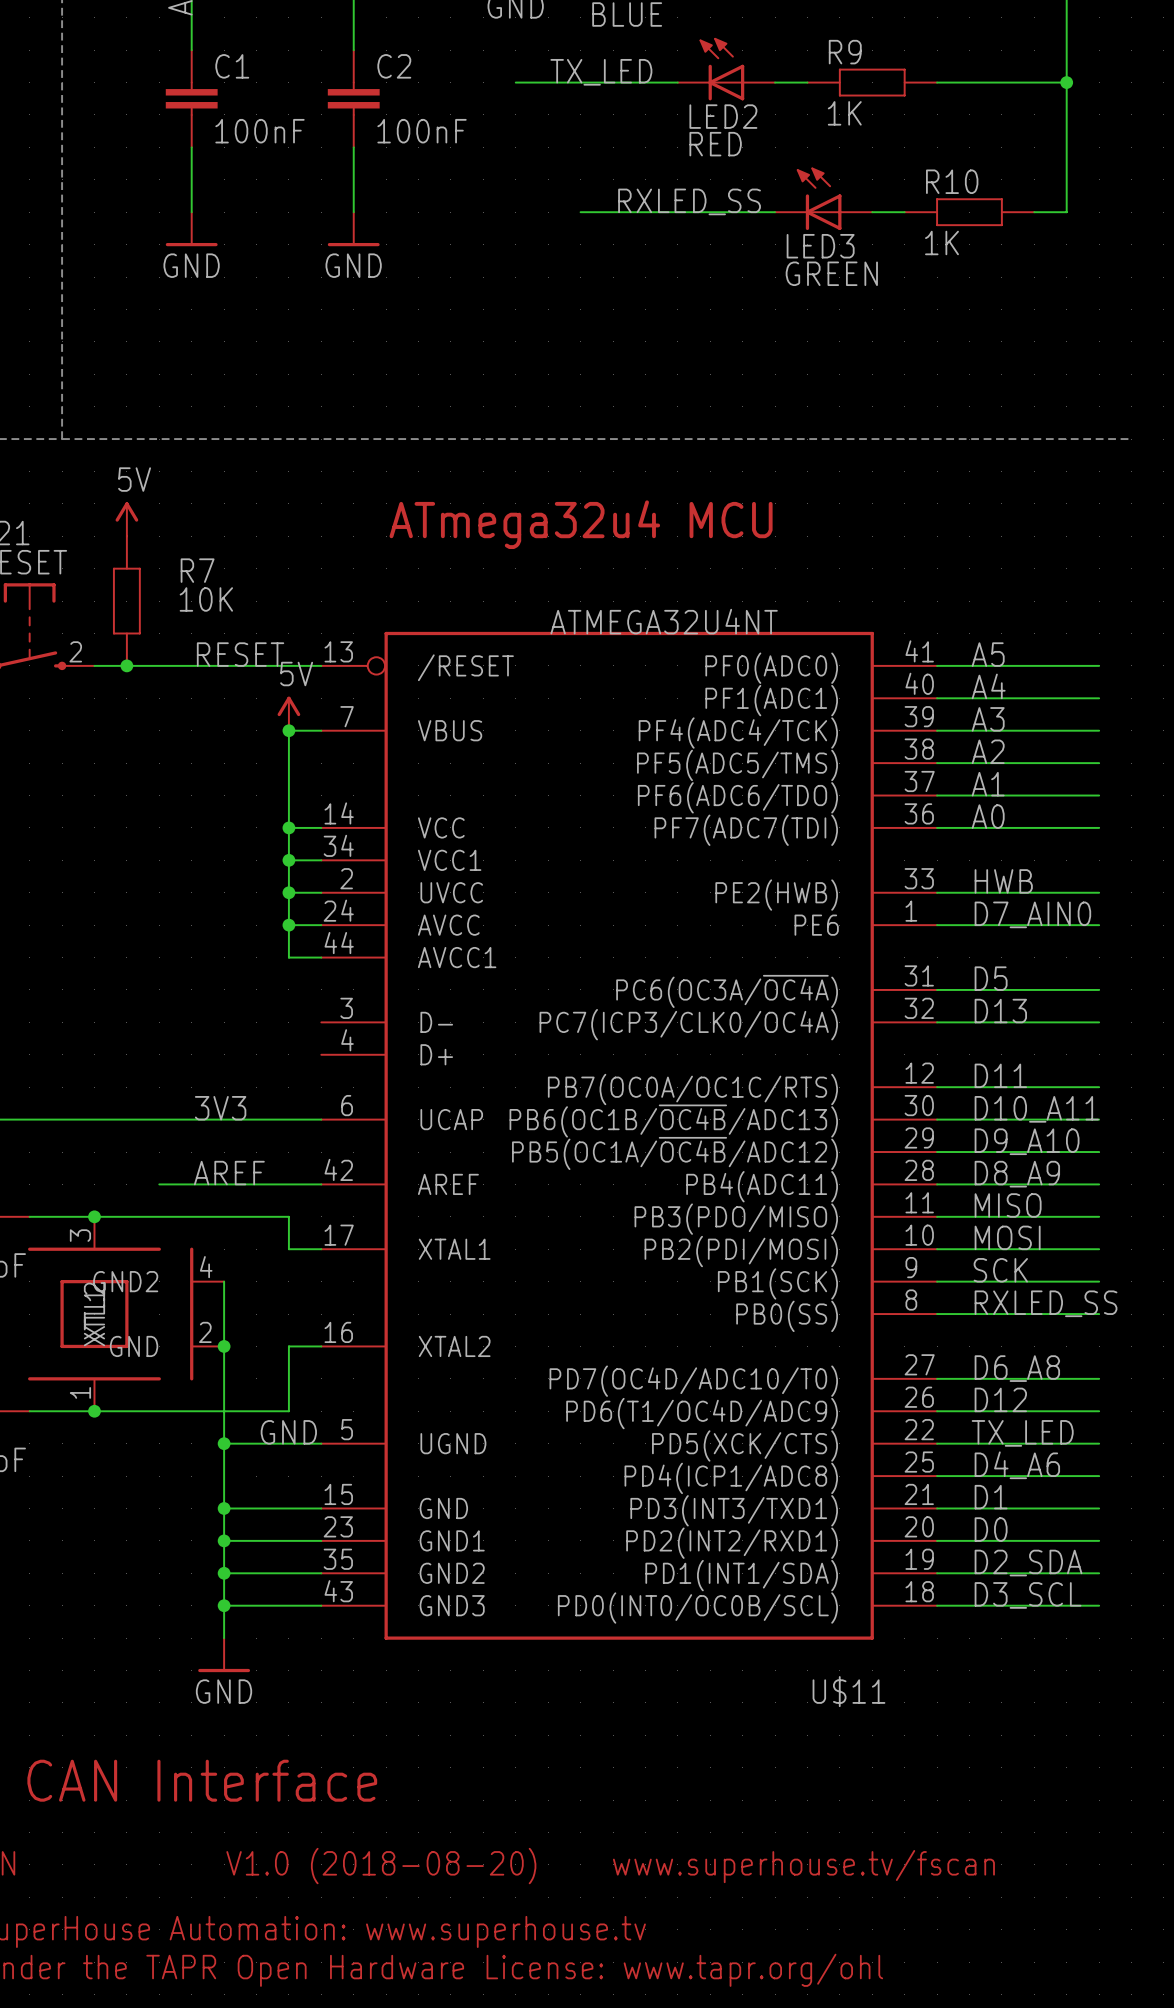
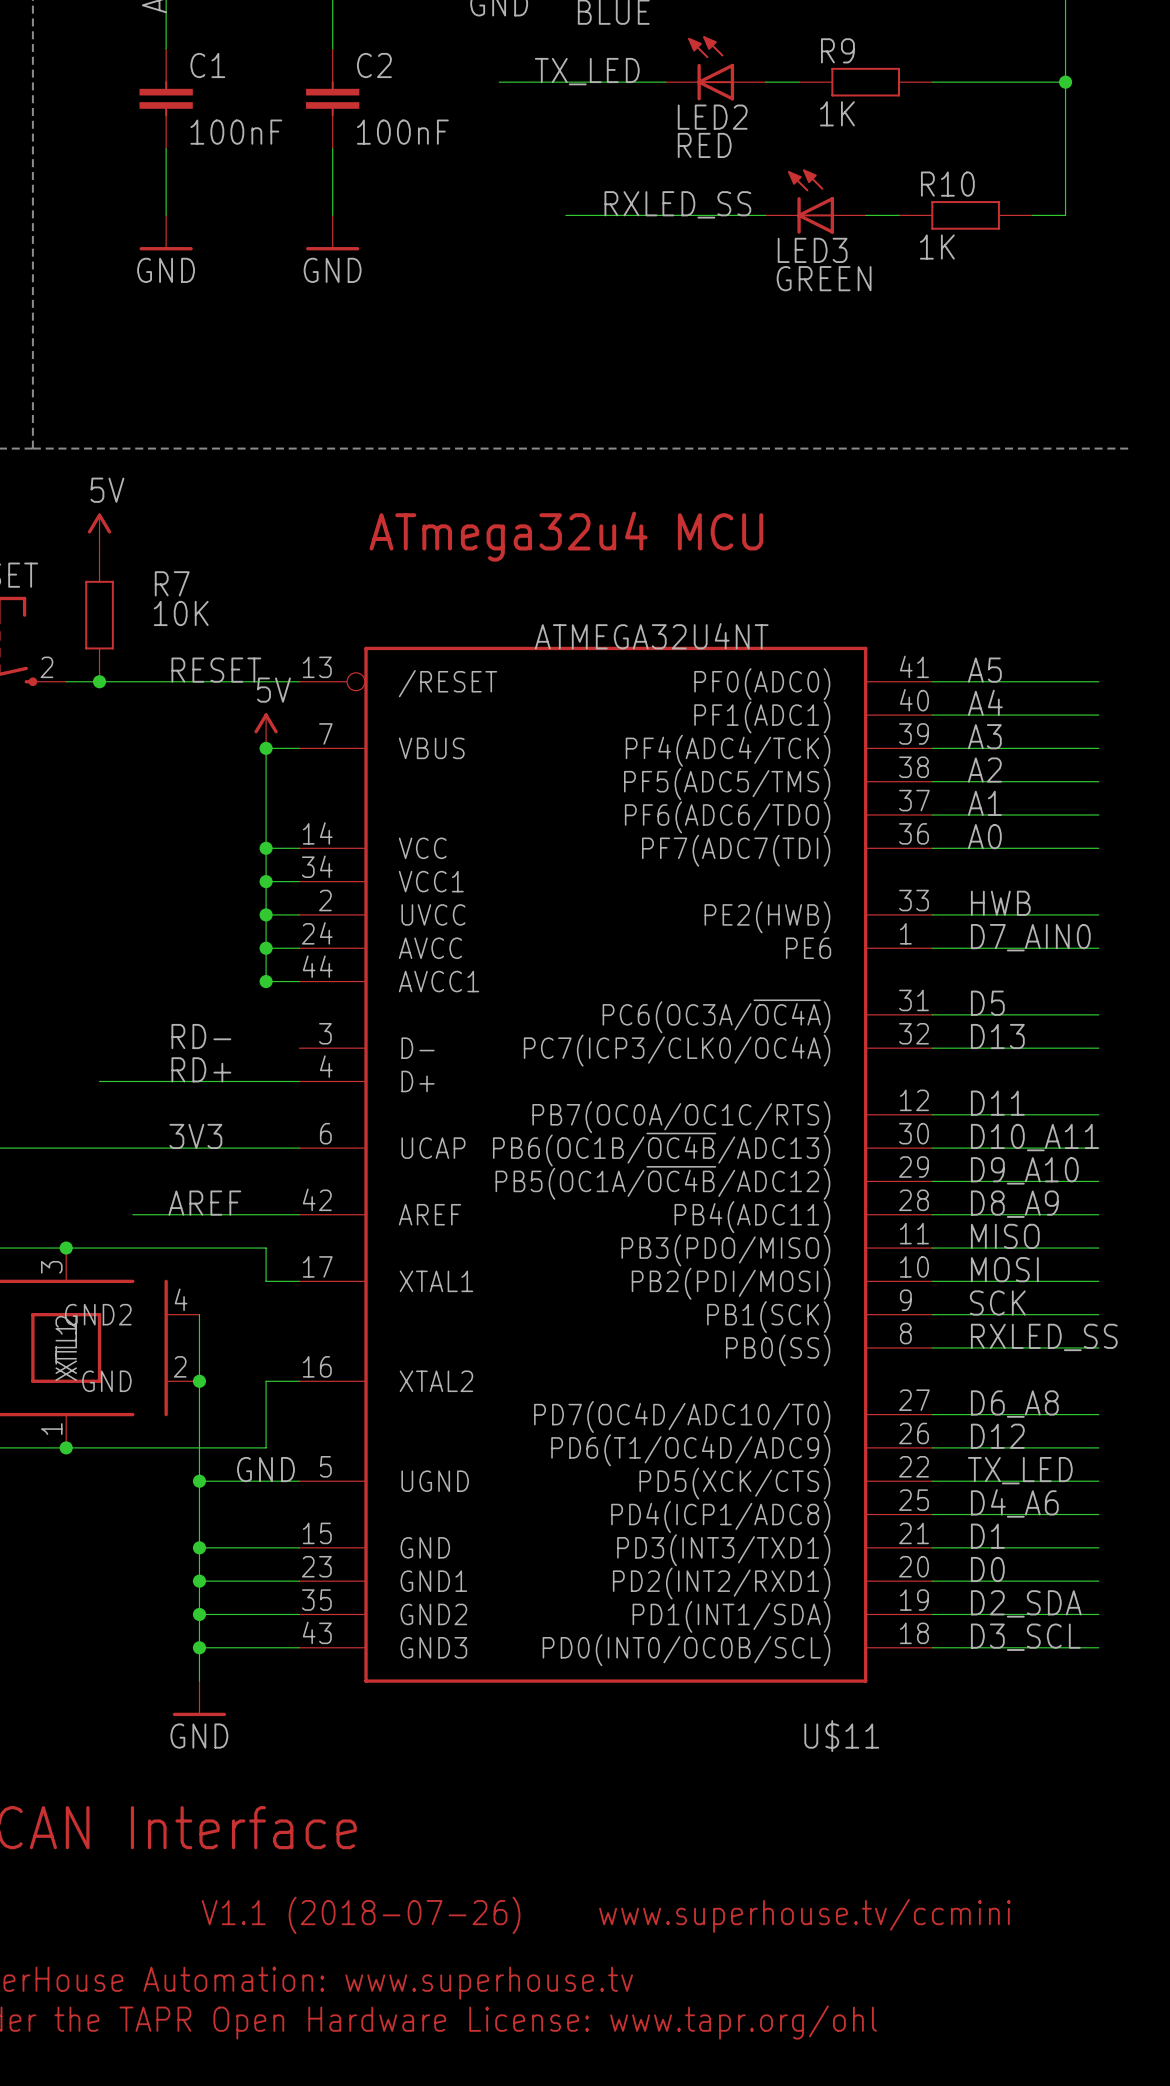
junction: none -> (266, 981)
label: none -> RD- (201, 1036)
label: none -> RD+ (201, 1069)
wire: none -> (99, 1081) (299, 1081)
text: V1.0 (2018-08-20) (381, 1866) -> V1.1 (2018-07-26) (361, 1915)
text: www.superhouse.tv/fscan (803, 1866) -> www.superhouse.tv/ccmini (804, 1915)

